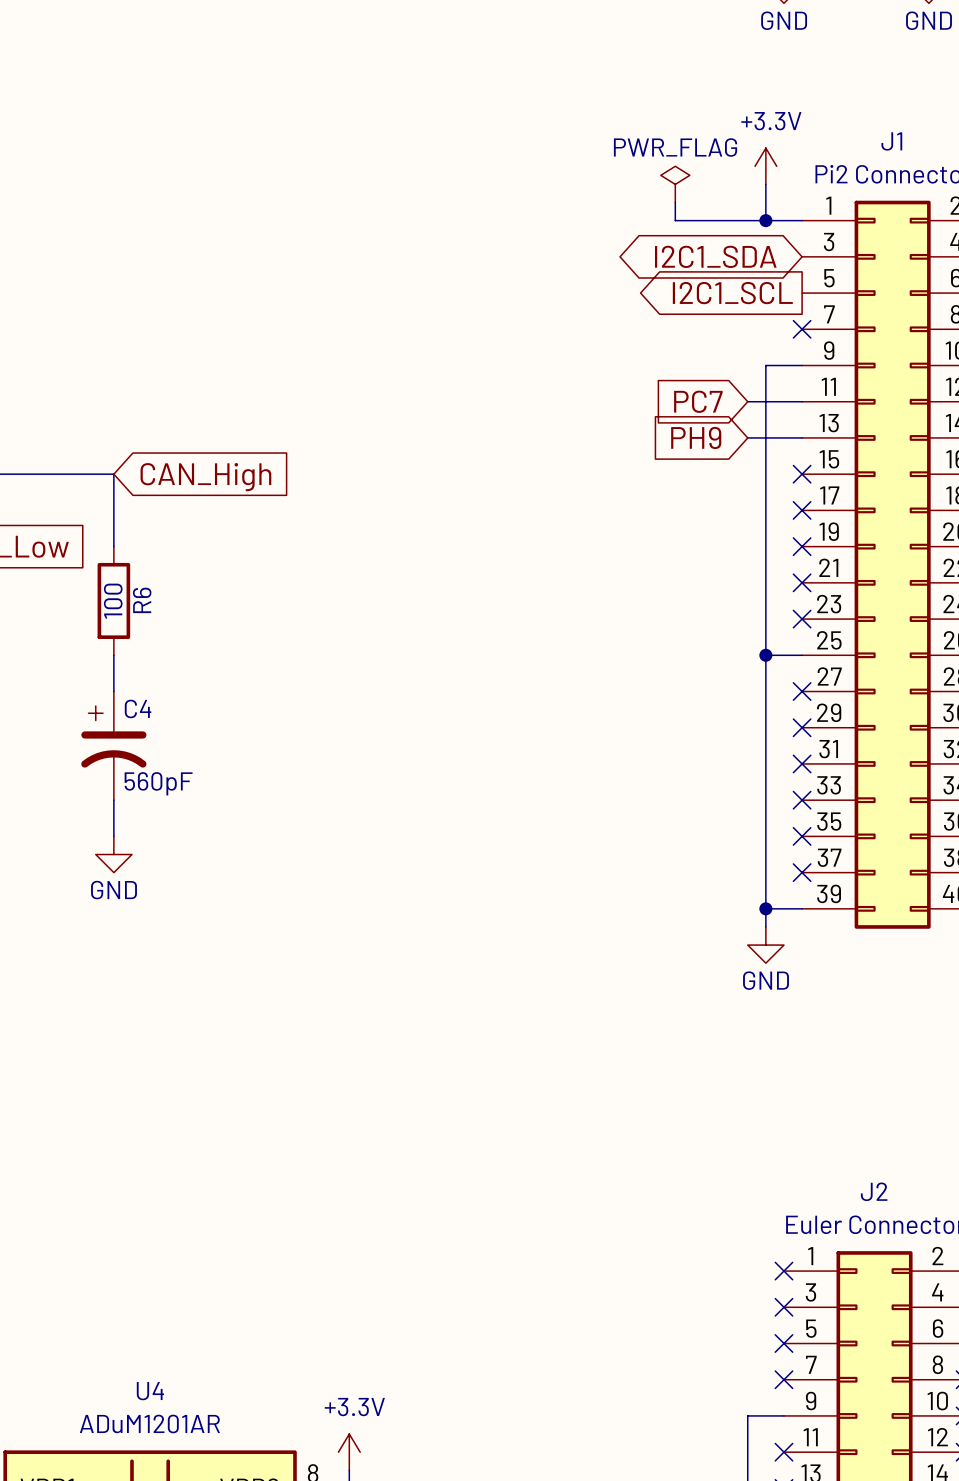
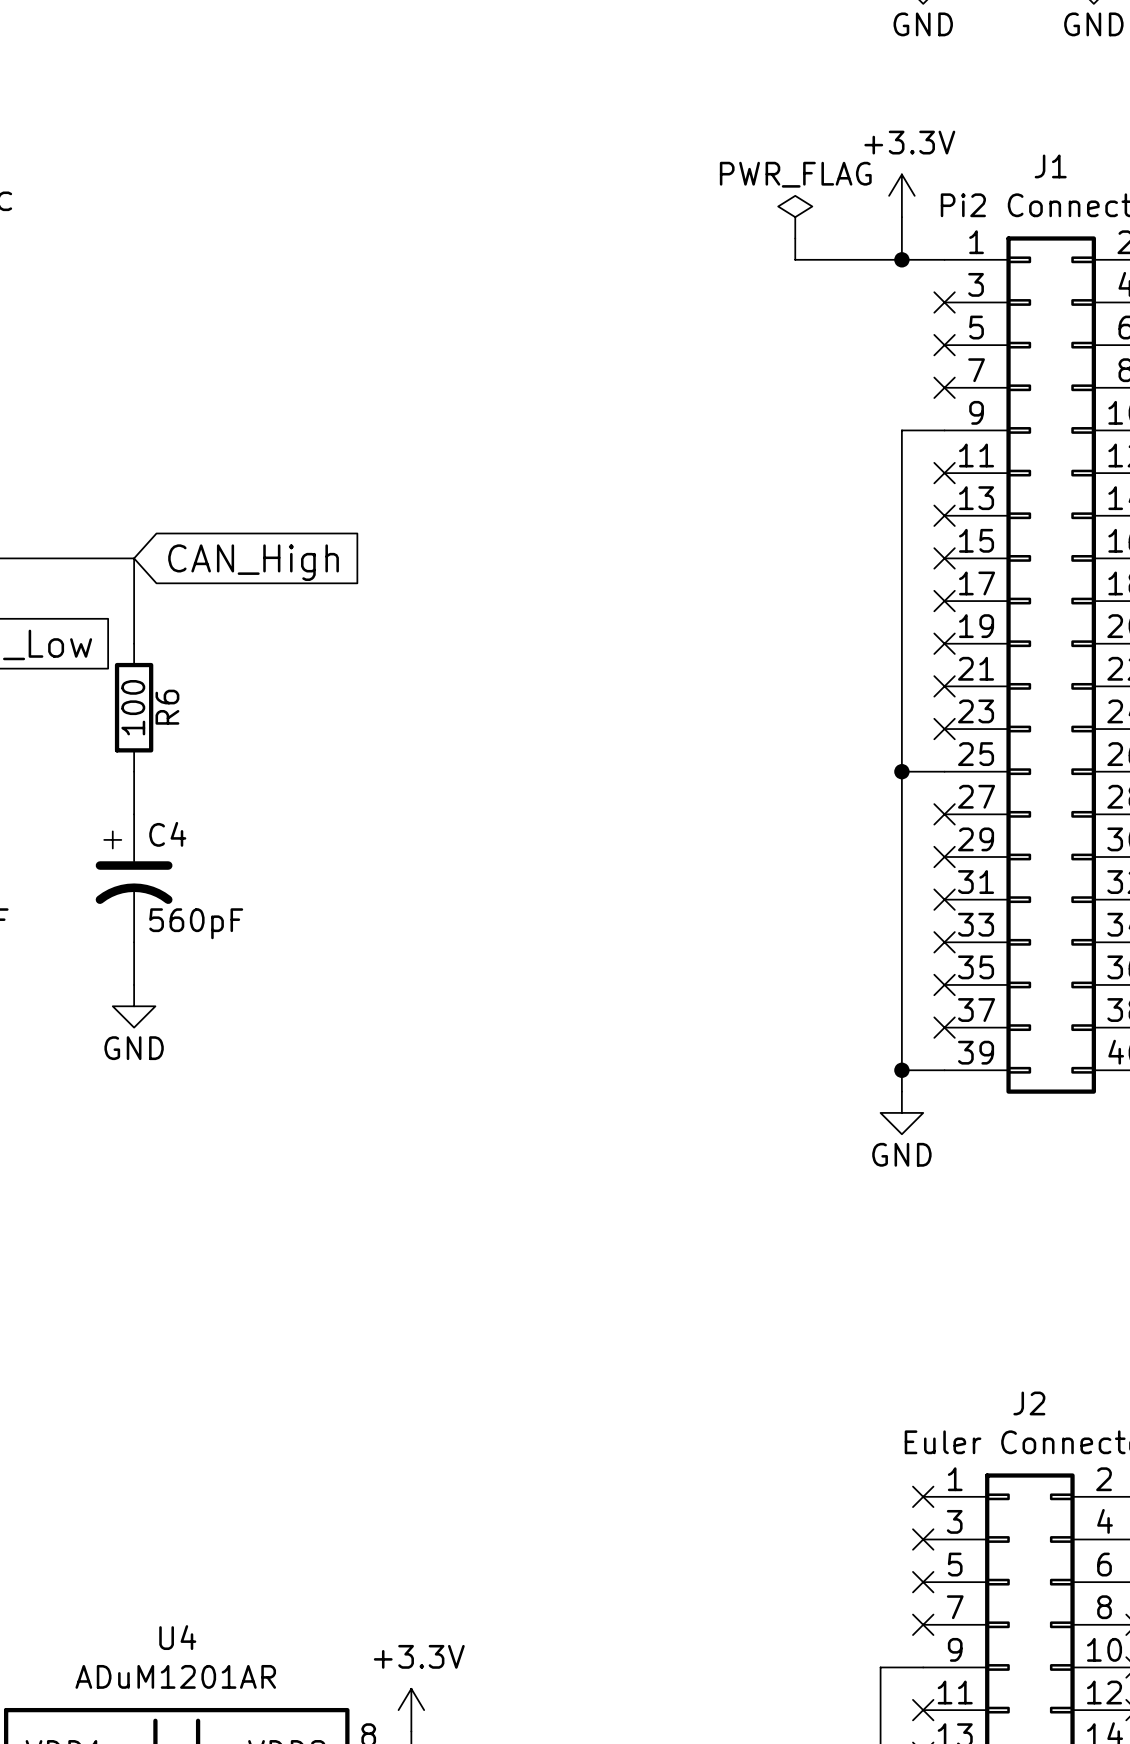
global label: I2C1_SDA (715, 256) -> none
no-connect mark: none -> (944, 302)
global label: I2C1_SCL (732, 293) -> none
no-connect mark: none -> (944, 345)
global label: PC7 (698, 401) -> none
wire: (747, 401) (802, 401) -> none
no-connect mark: none -> (944, 473)
global label: PH9 (696, 437) -> none
wire: (747, 437) (802, 437) -> none
no-connect mark: none -> (944, 515)

